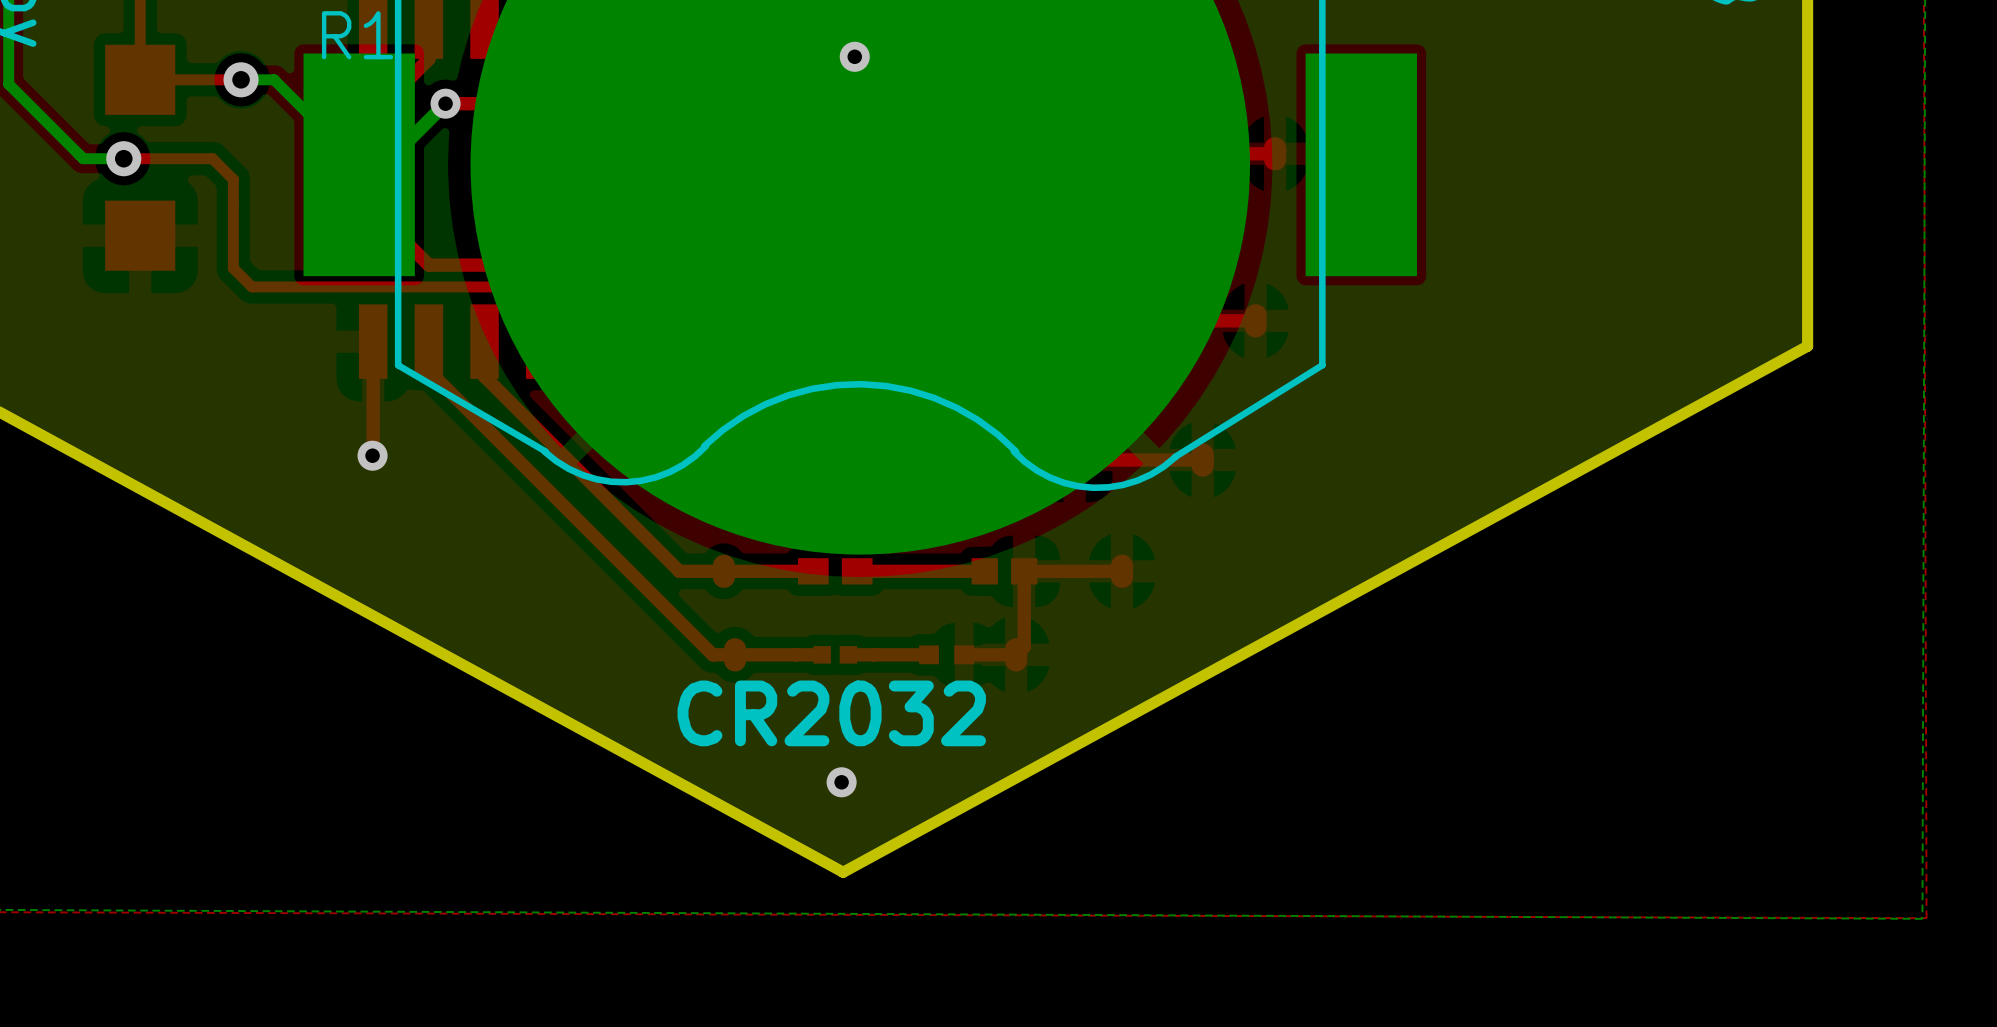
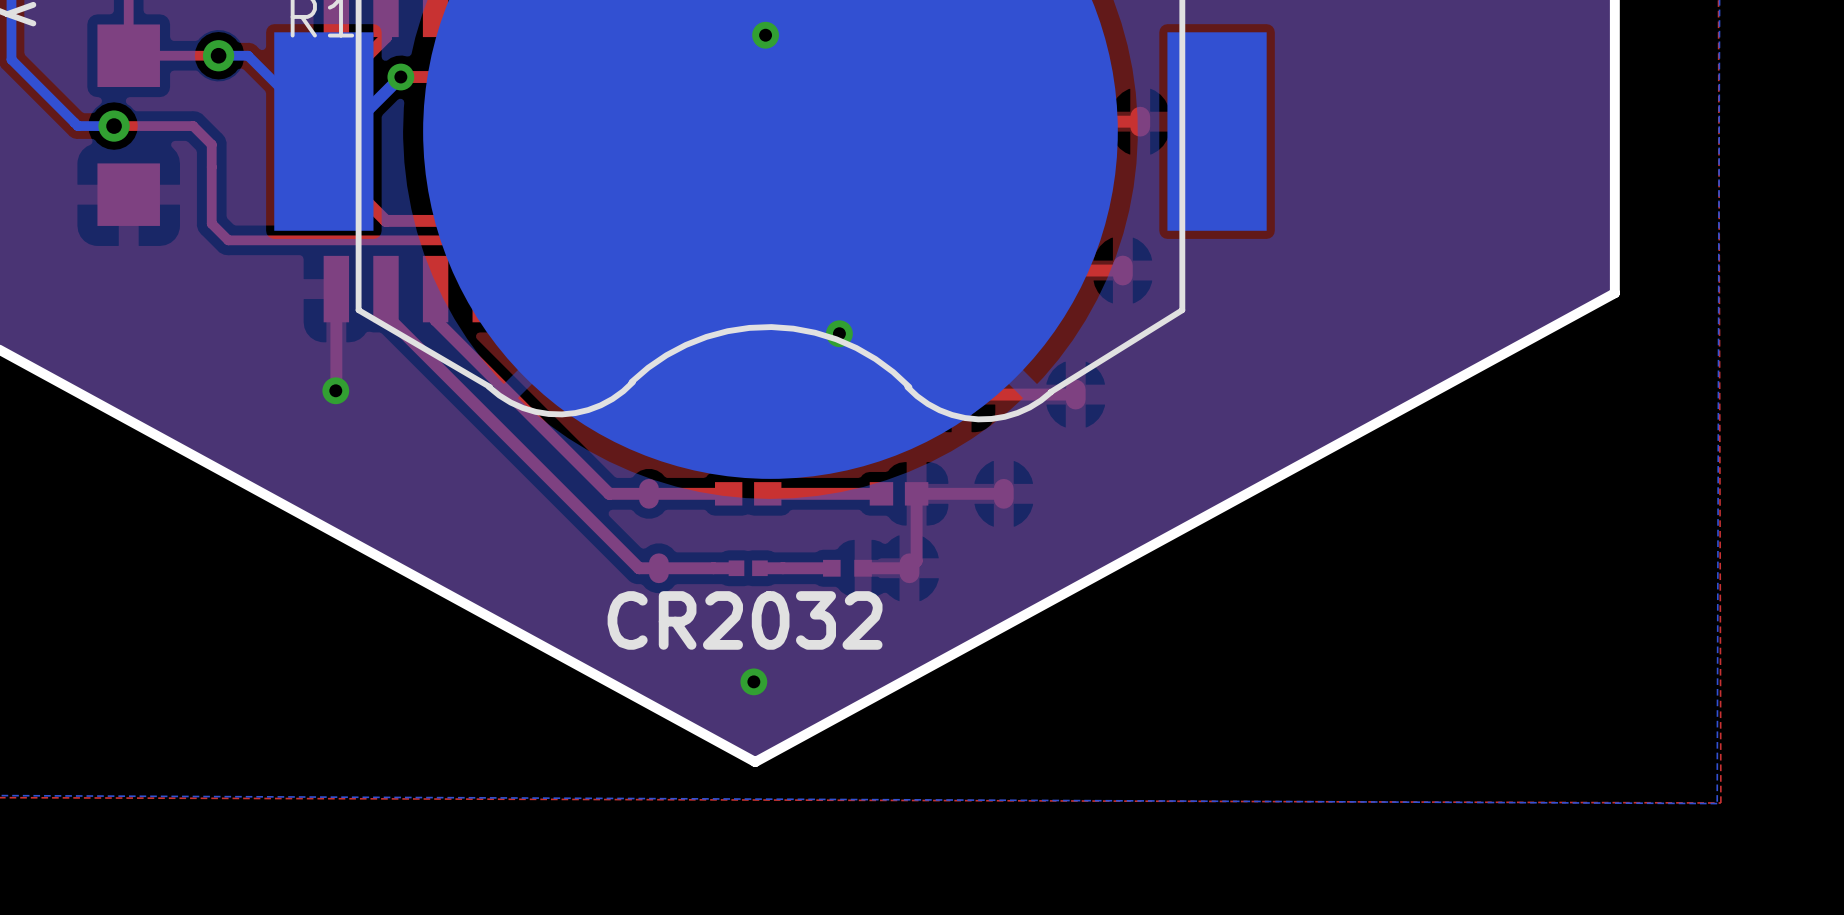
via: none -> (839, 333)

